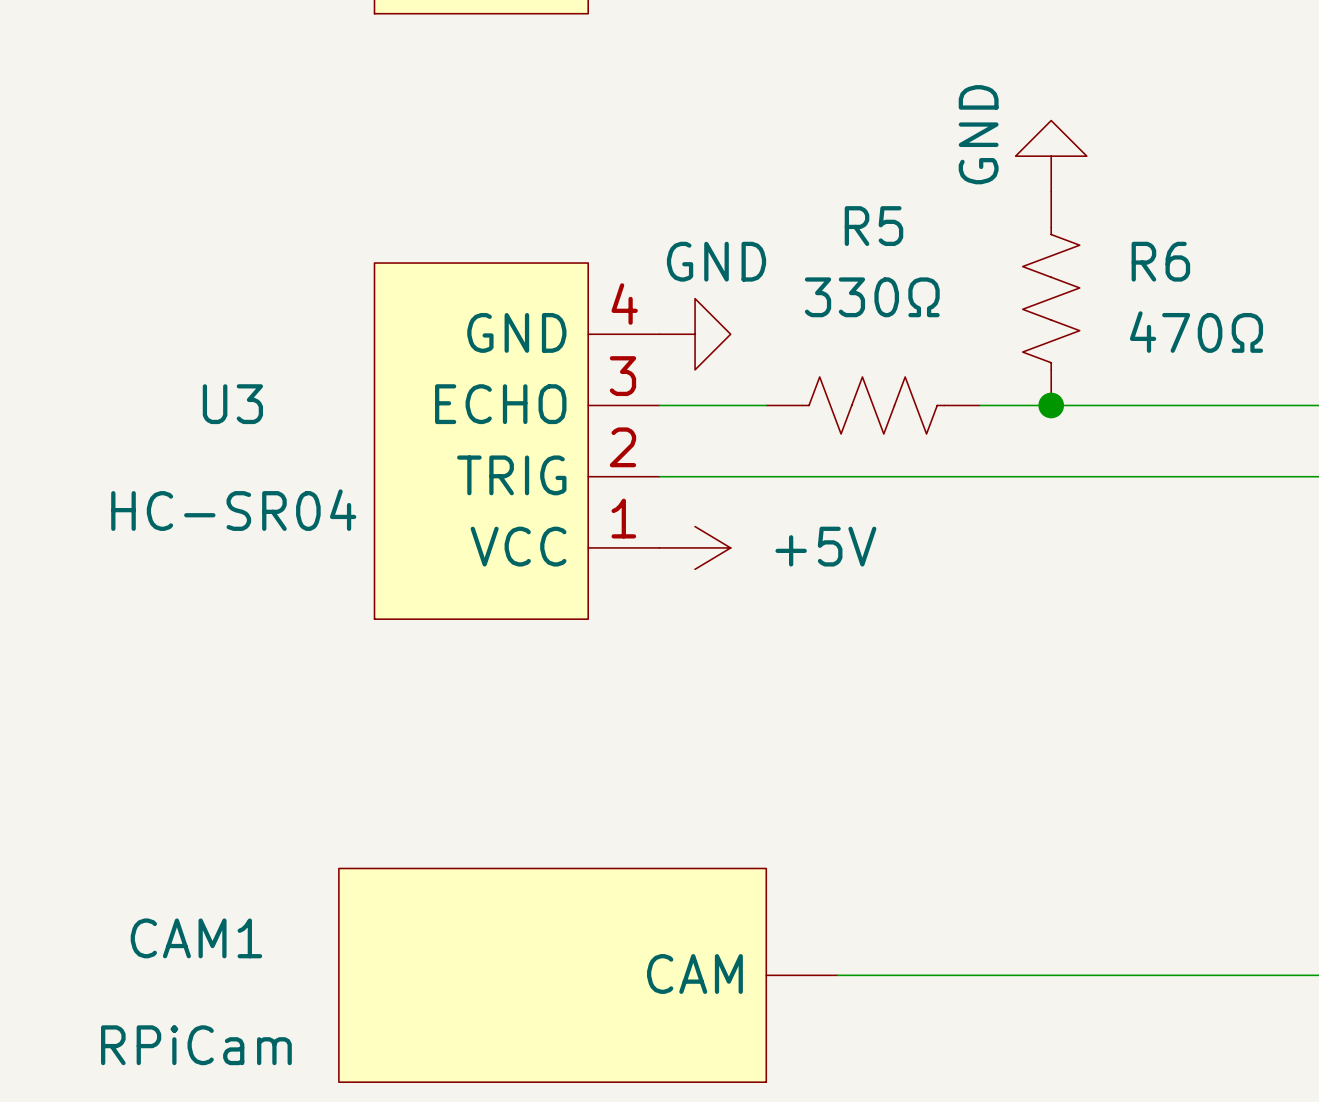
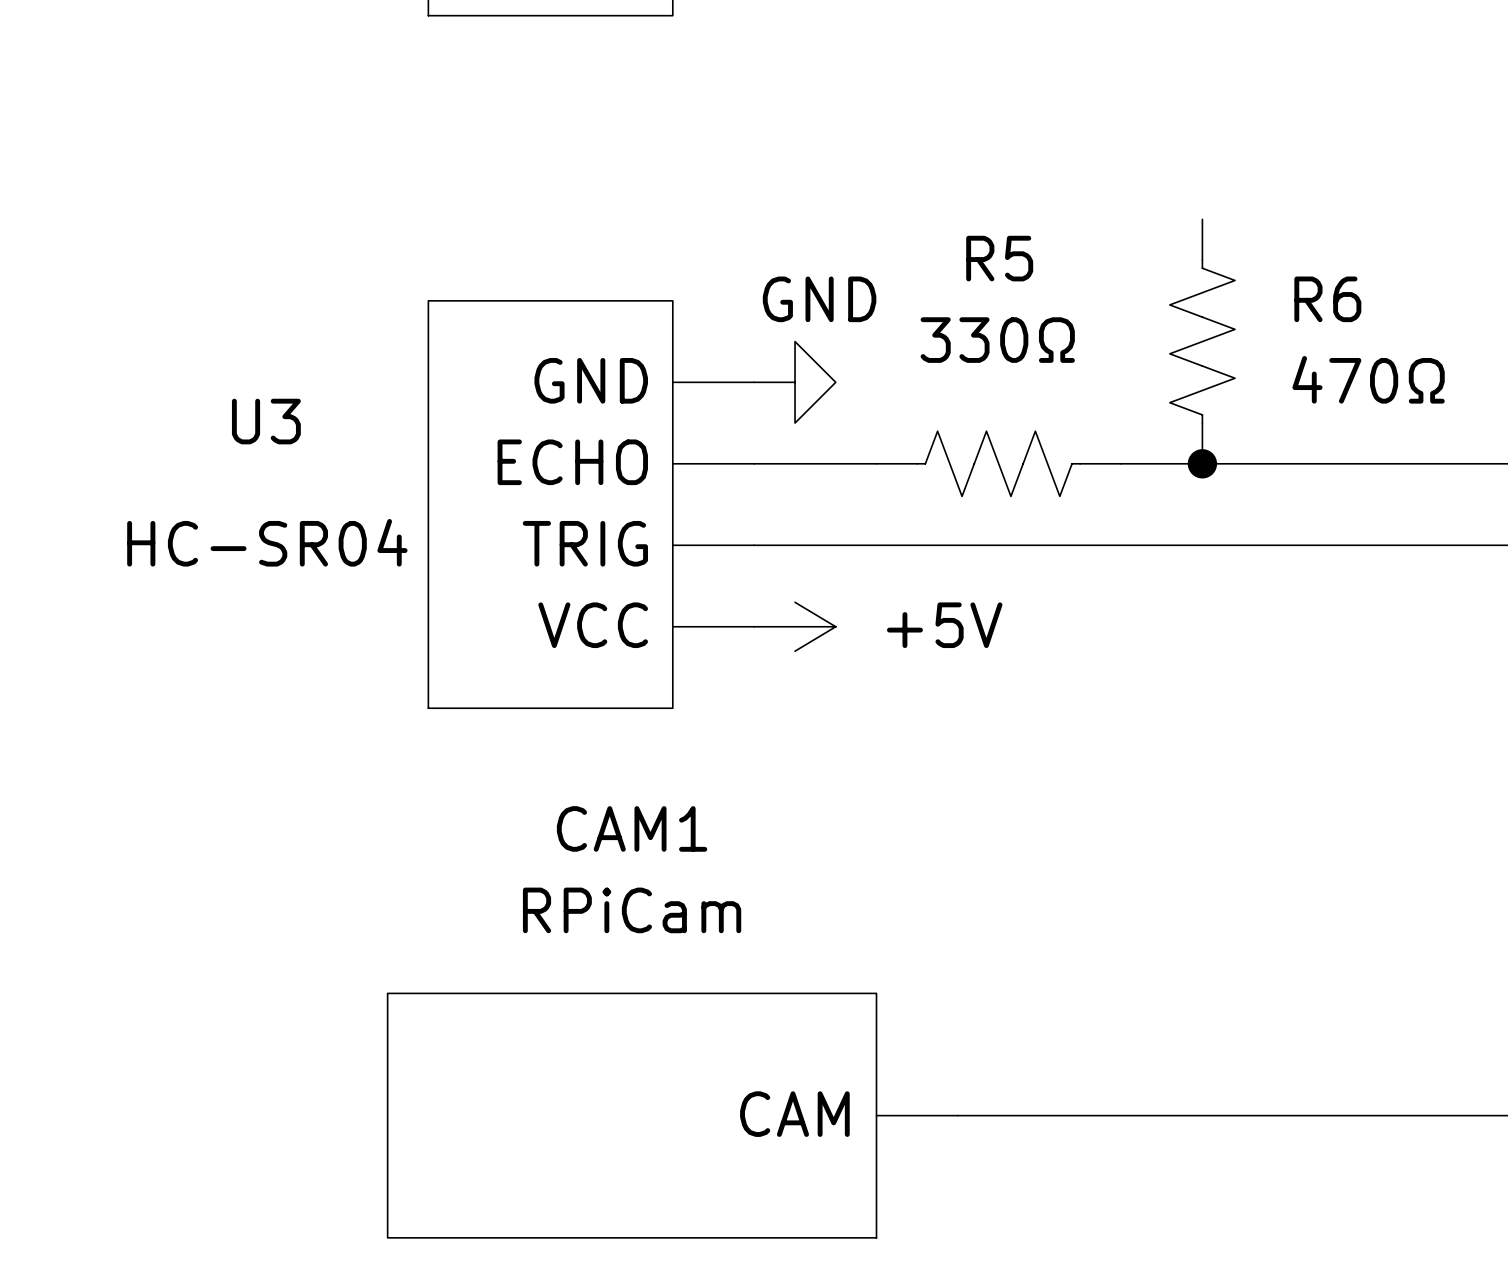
power symbol: GND (1051, 156) -> none
U3 pin number: 4 (624, 304) -> none
U3 pin number: 3 (622, 376) -> none
U3 name position: U3 (232, 404) -> U3 (266, 421)
U3 pin number: 2 (622, 447) -> none
U3 value position: HC-SR04 (233, 510) -> HC-SR04 (267, 542)
U3 pin number: 1 (623, 518) -> none
CAM1 name position: CAM1 (196, 938) -> CAM1 (632, 828)
CAM1 value position: RPiCam (196, 1045) -> RPiCam (632, 910)

